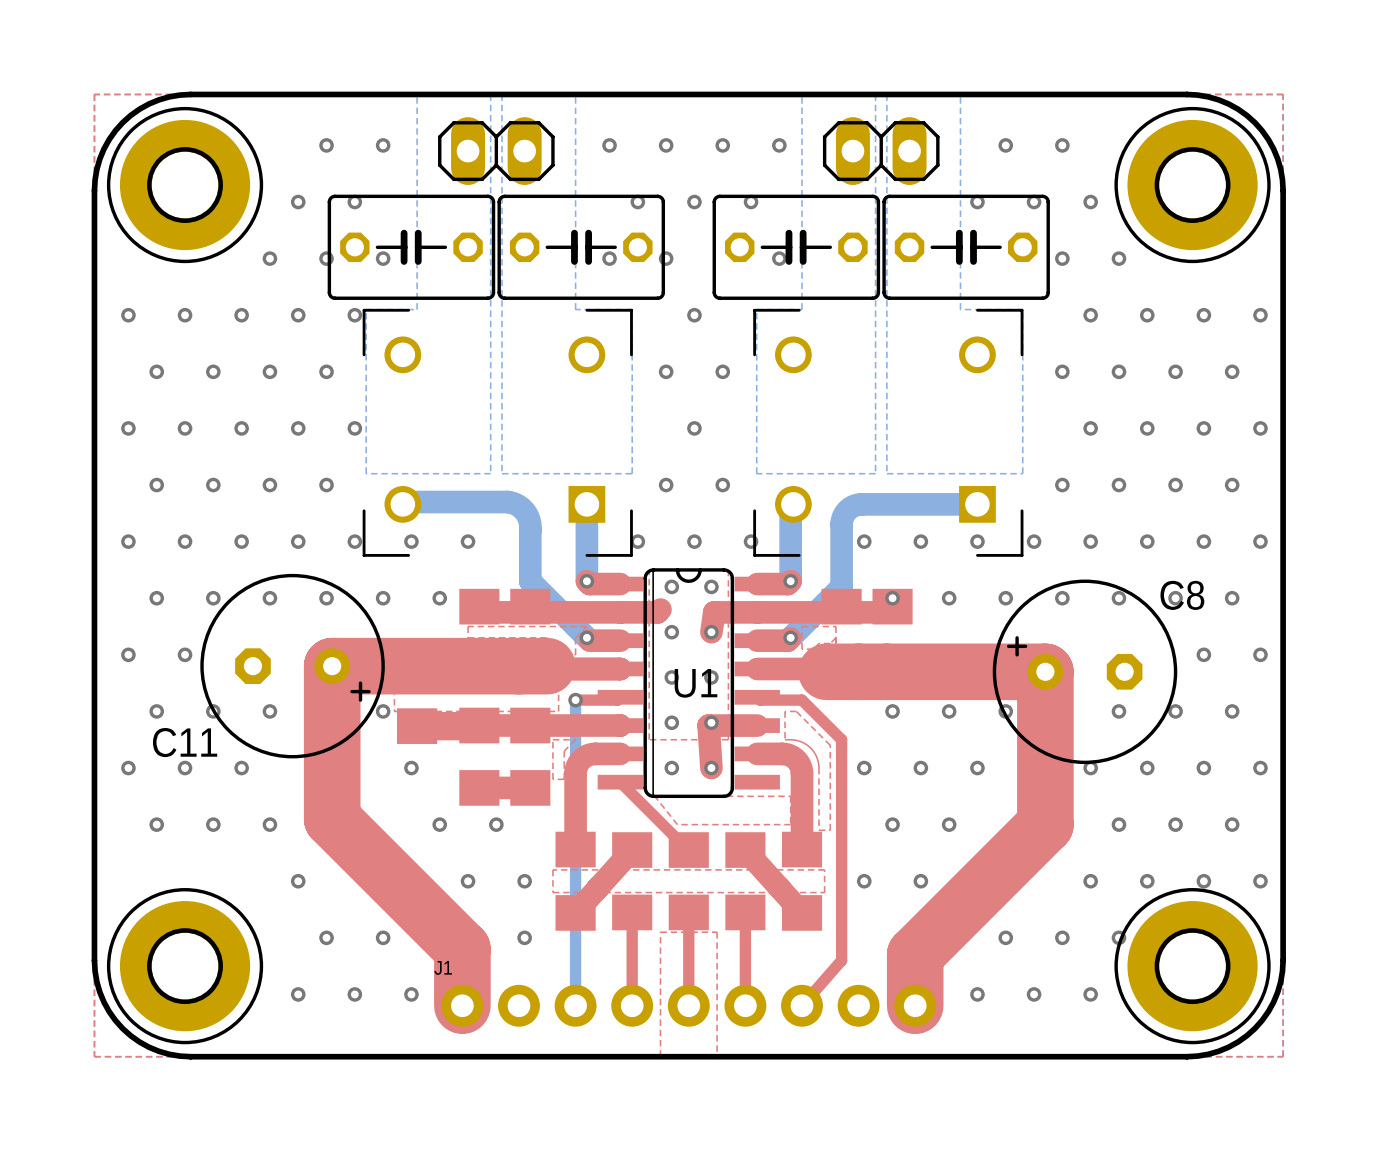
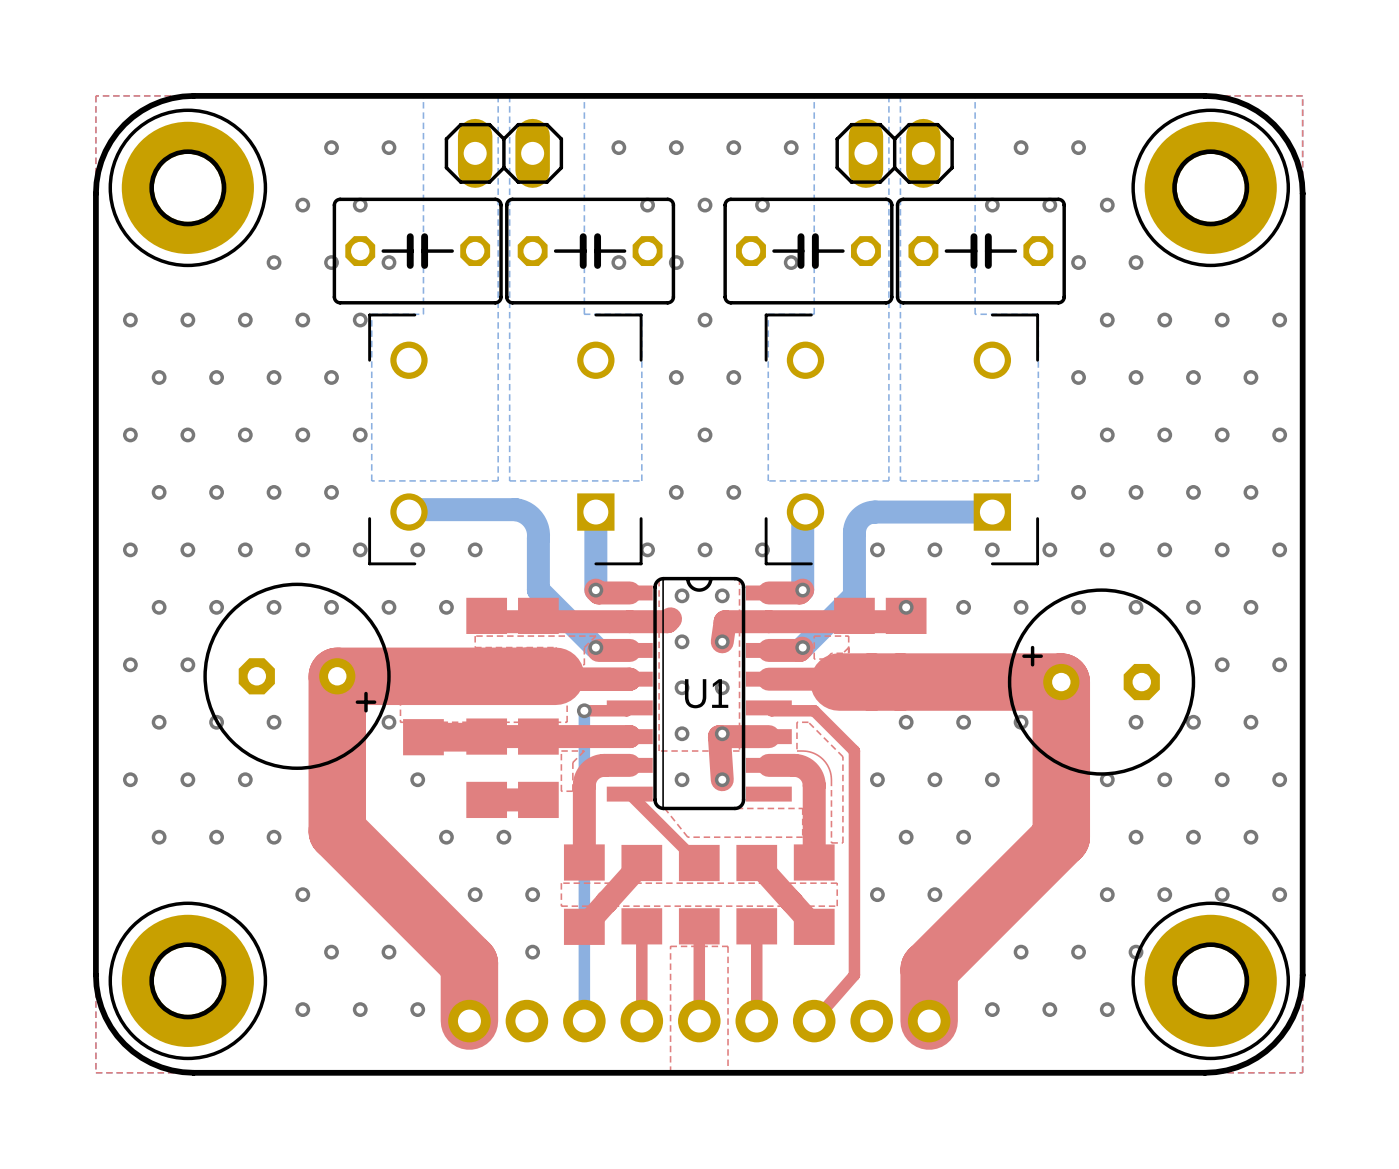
C8 name: C8 (1182, 595) -> none
C11 name: C11 (185, 742) -> none
J1 name: J1 (443, 967) -> none

